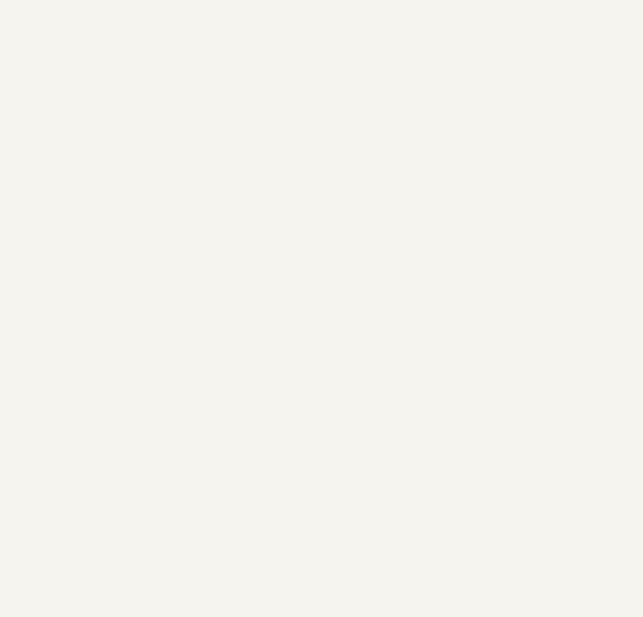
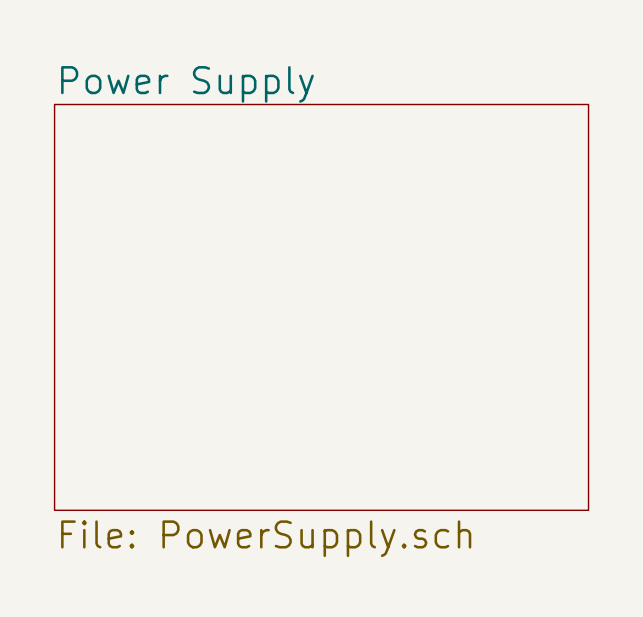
sheet Power Supply: none -> File: PowerSupply.sch (321, 307)

